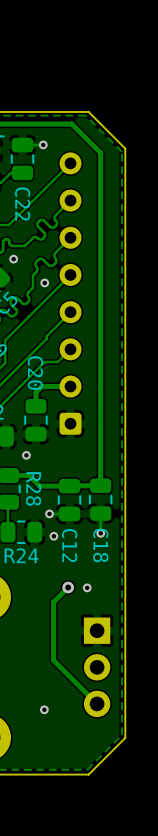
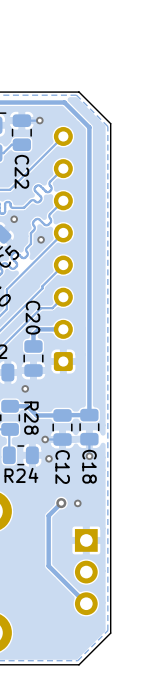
via: (44, 709) -> none

